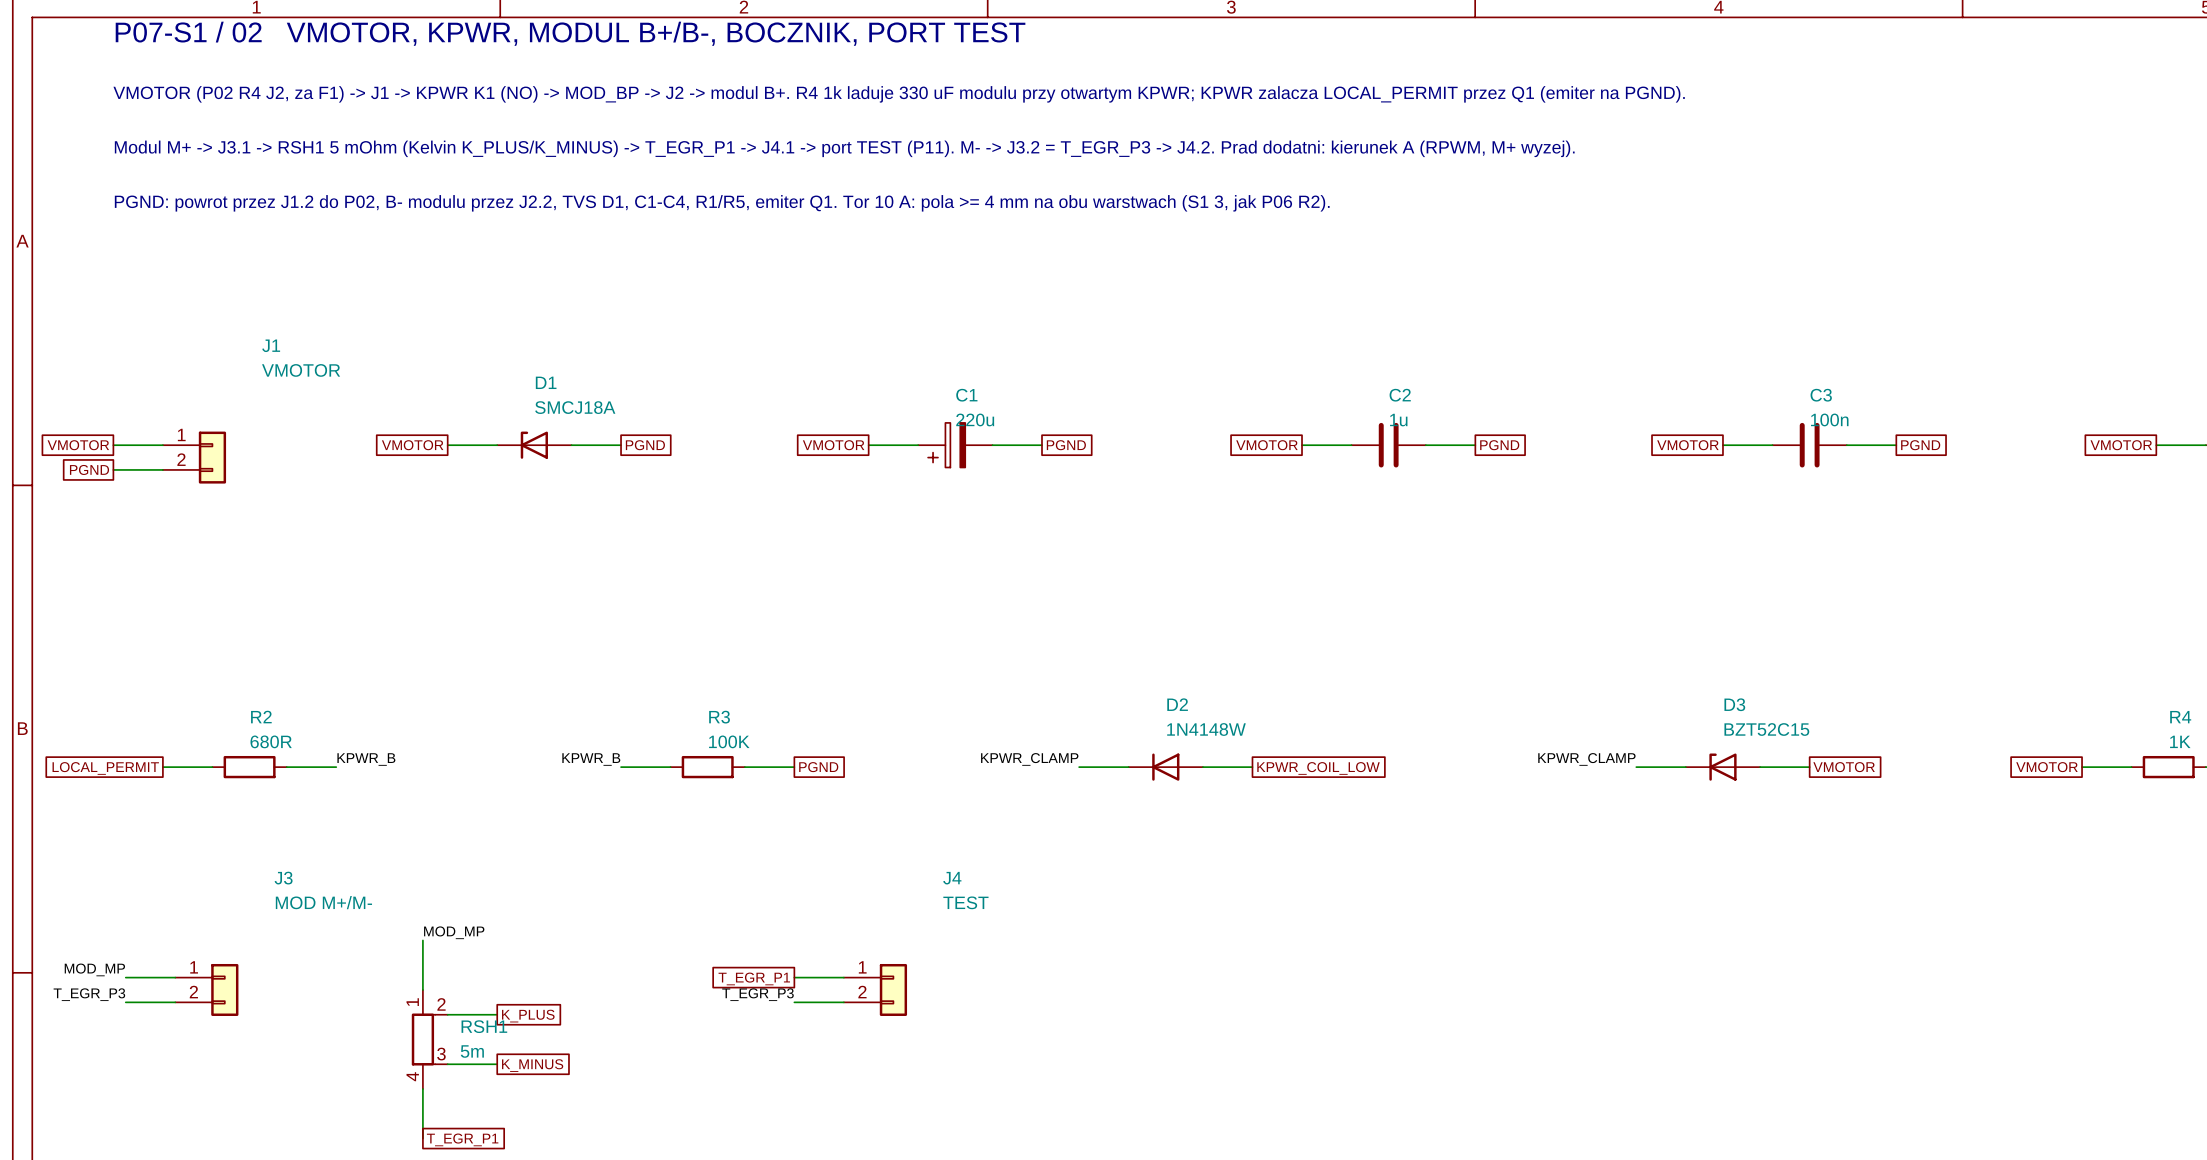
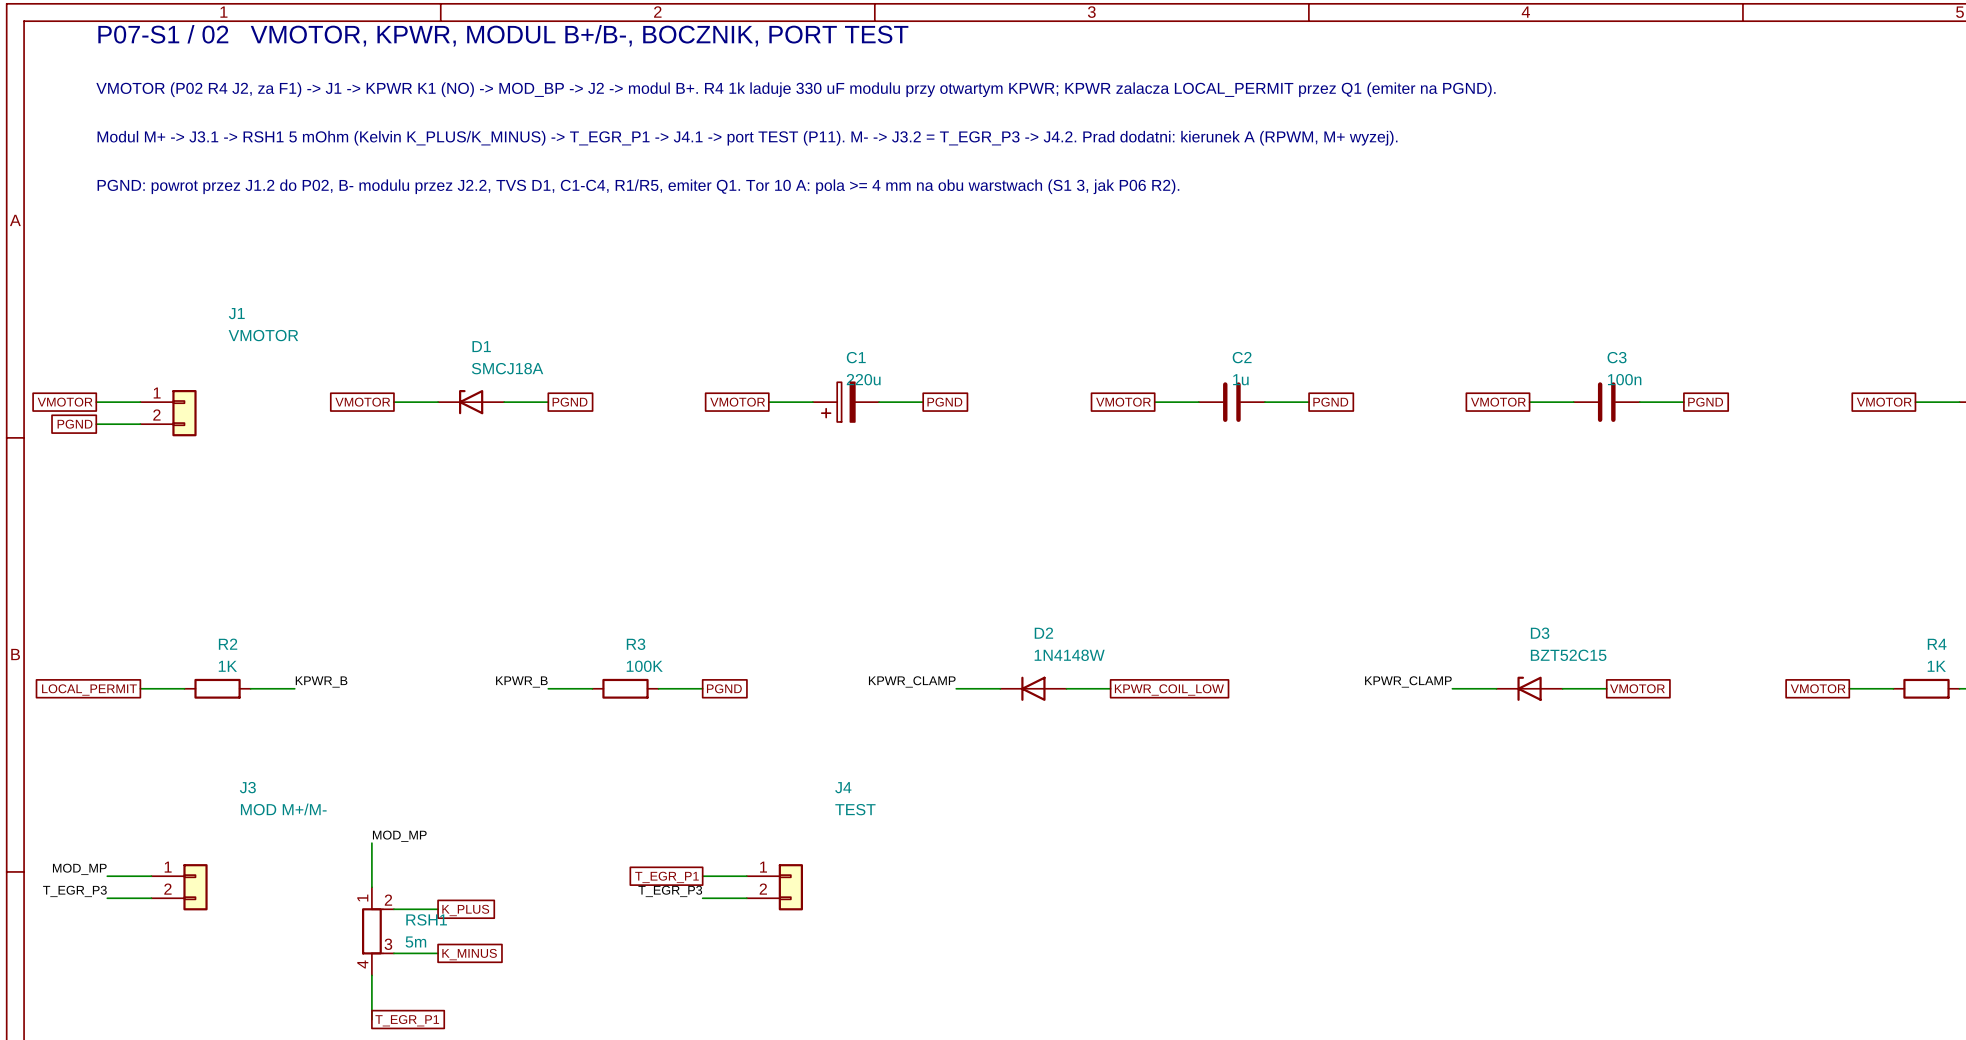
R2 value: 680R (271, 741) -> 1K (227, 666)

